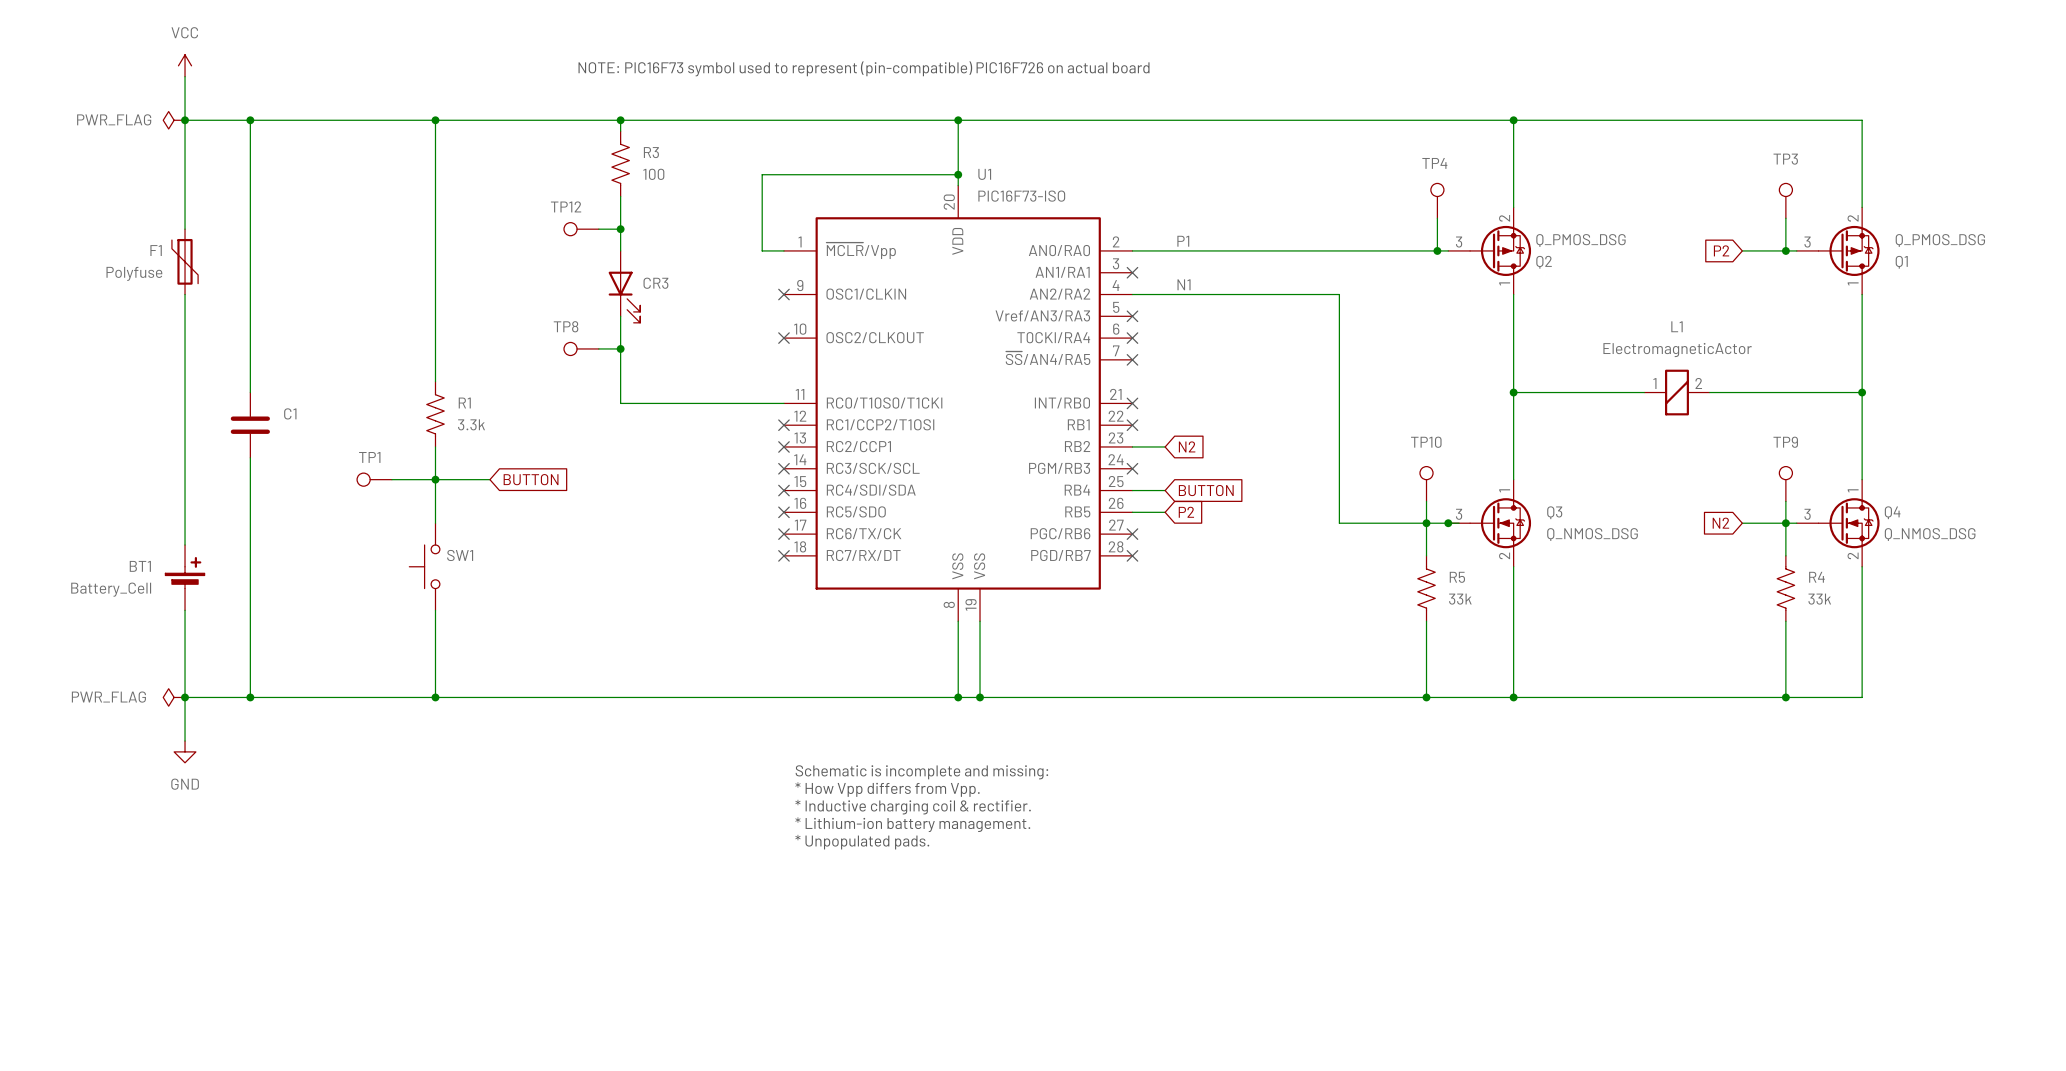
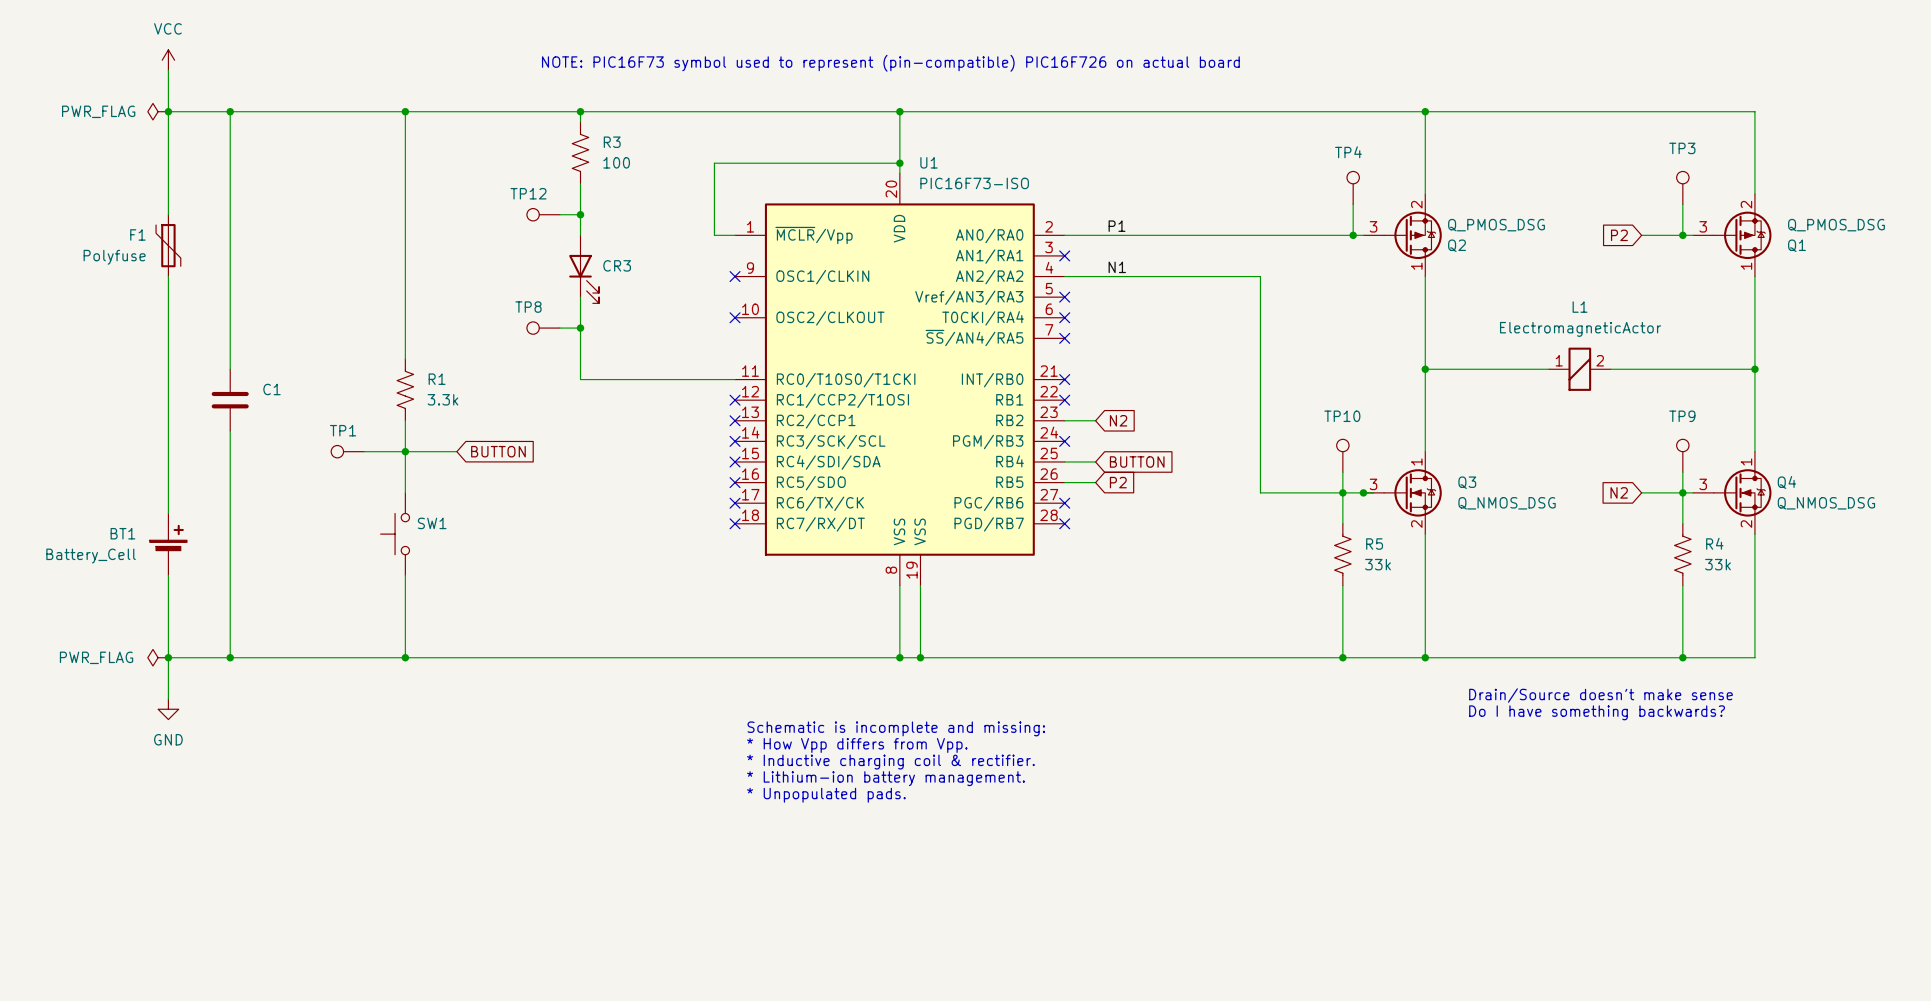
text: none -> Drain/Source doesn't make sense (1600, 695)
text: none -> Do I have something backwards? (1597, 712)

